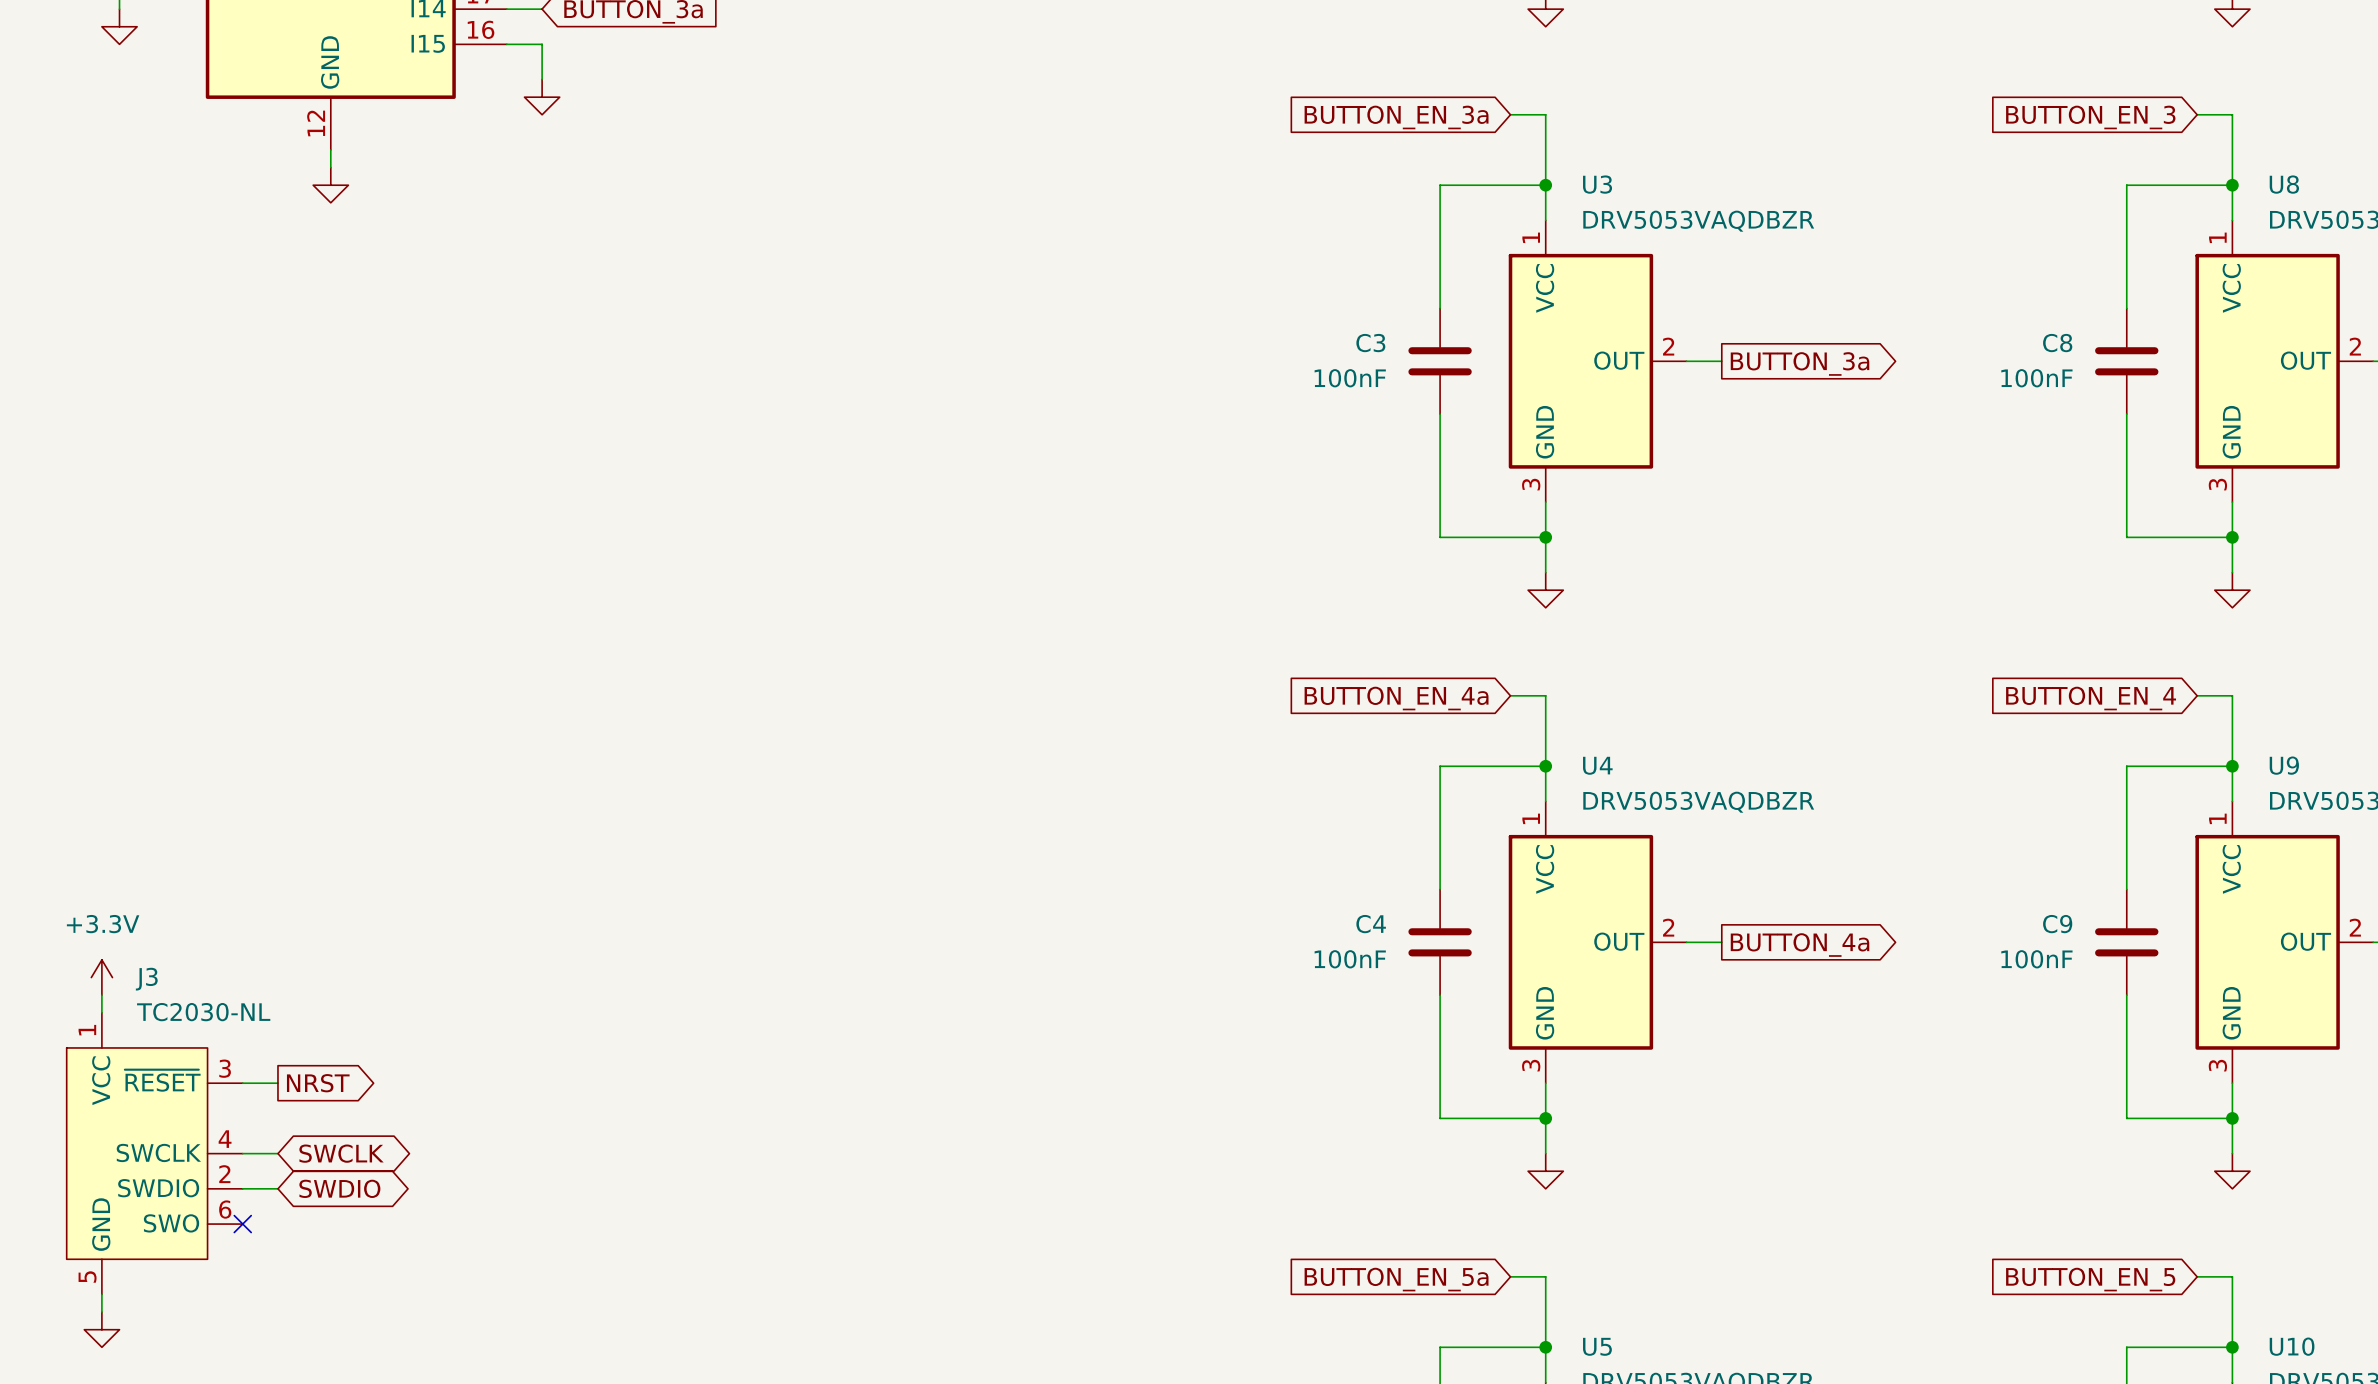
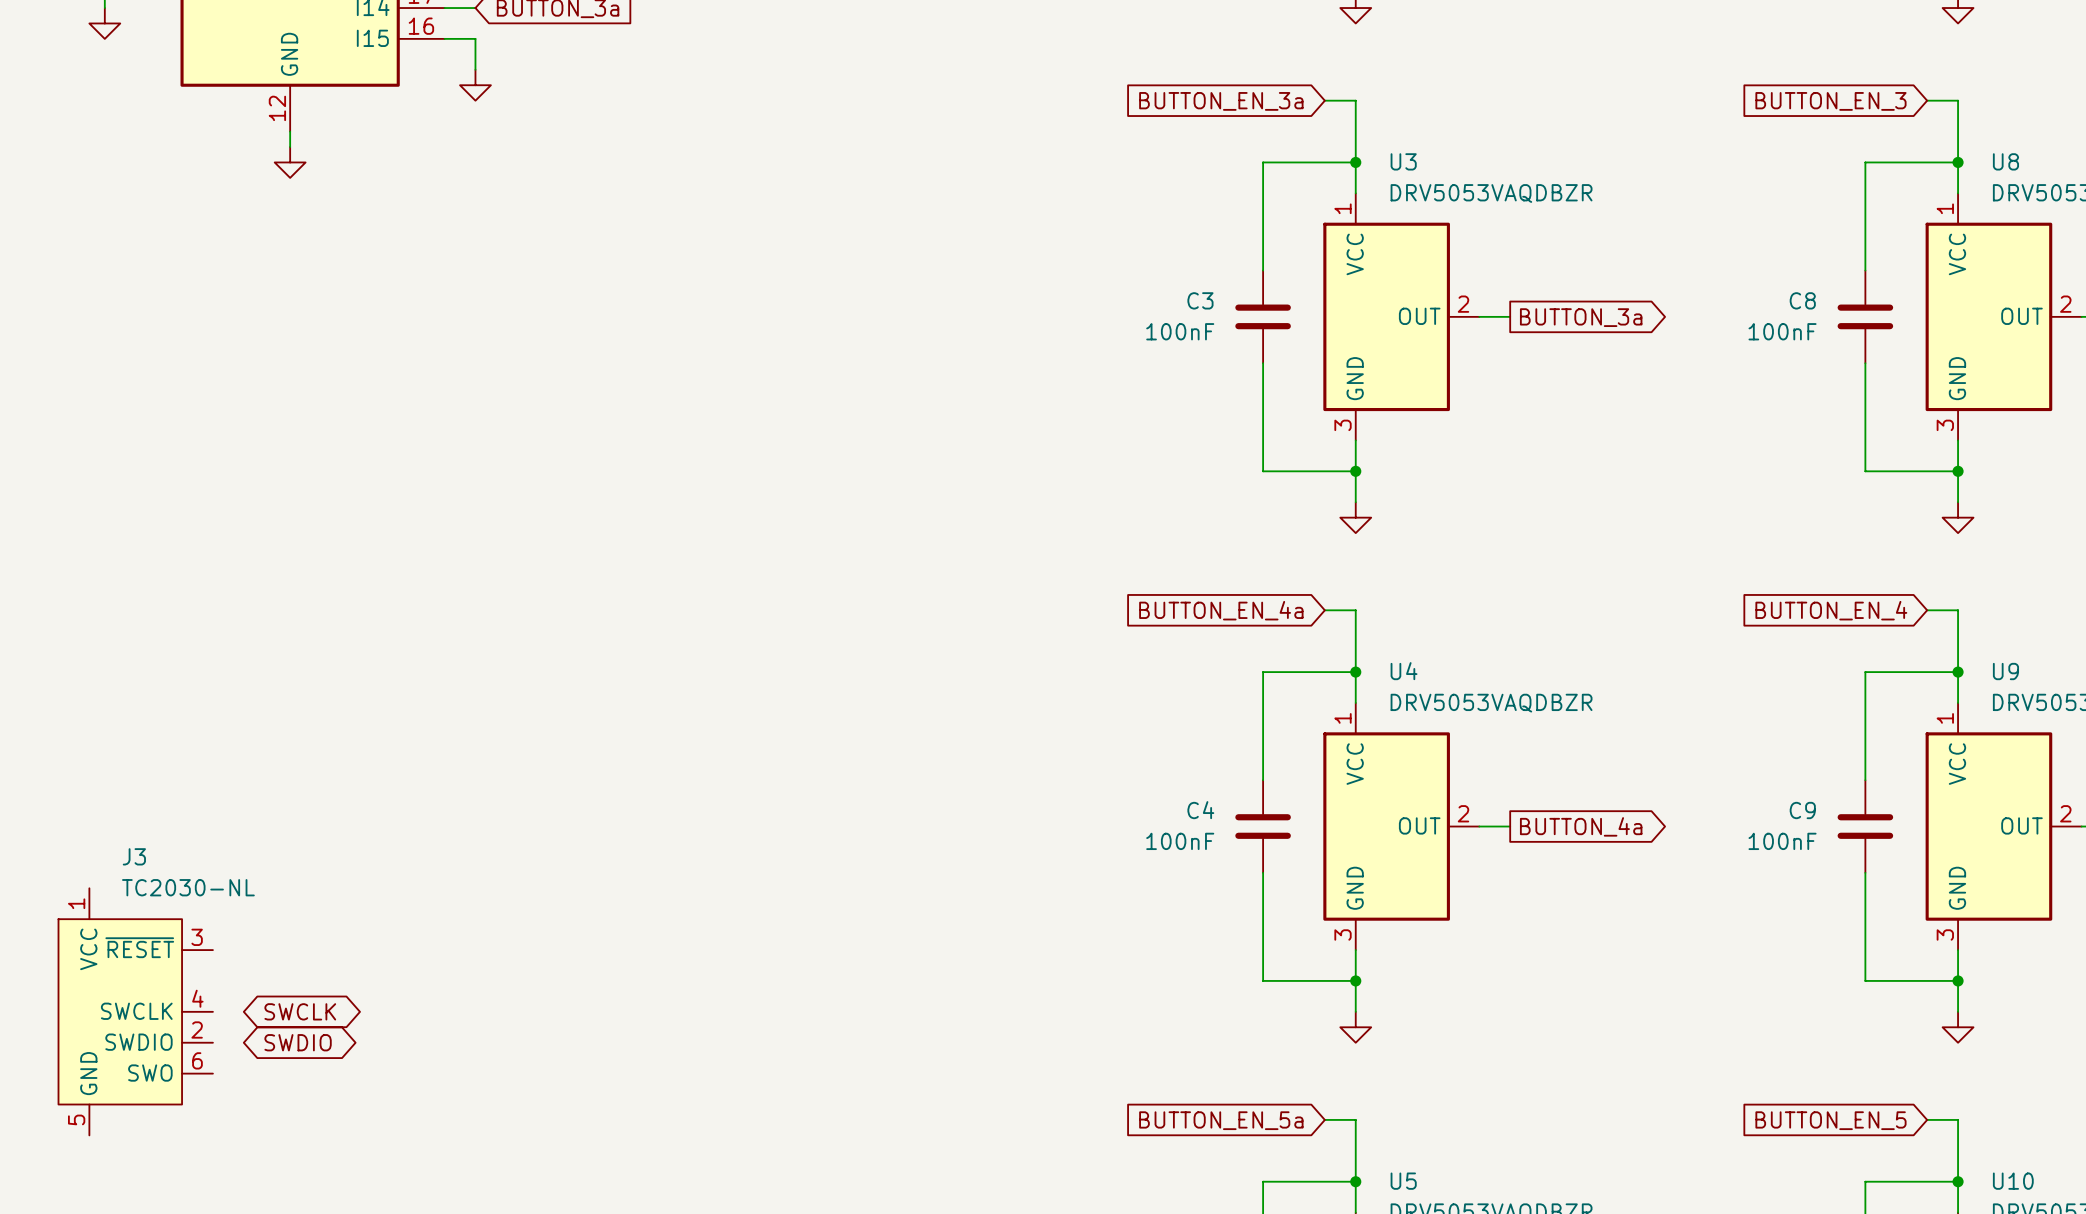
power symbol: +3.3V (101, 977) -> none
wire: (101, 995) (101, 1012) -> none
wire: (242, 1083) (277, 1083) -> none
global label: NRST (318, 1083) -> none
wire: (242, 1153) (277, 1153) -> none
wire: (242, 1188) (277, 1188) -> none
no-connect mark: (242, 1224) -> none
wire: (101, 1294) (101, 1312) -> none
power symbol: (101, 1329) -> none

